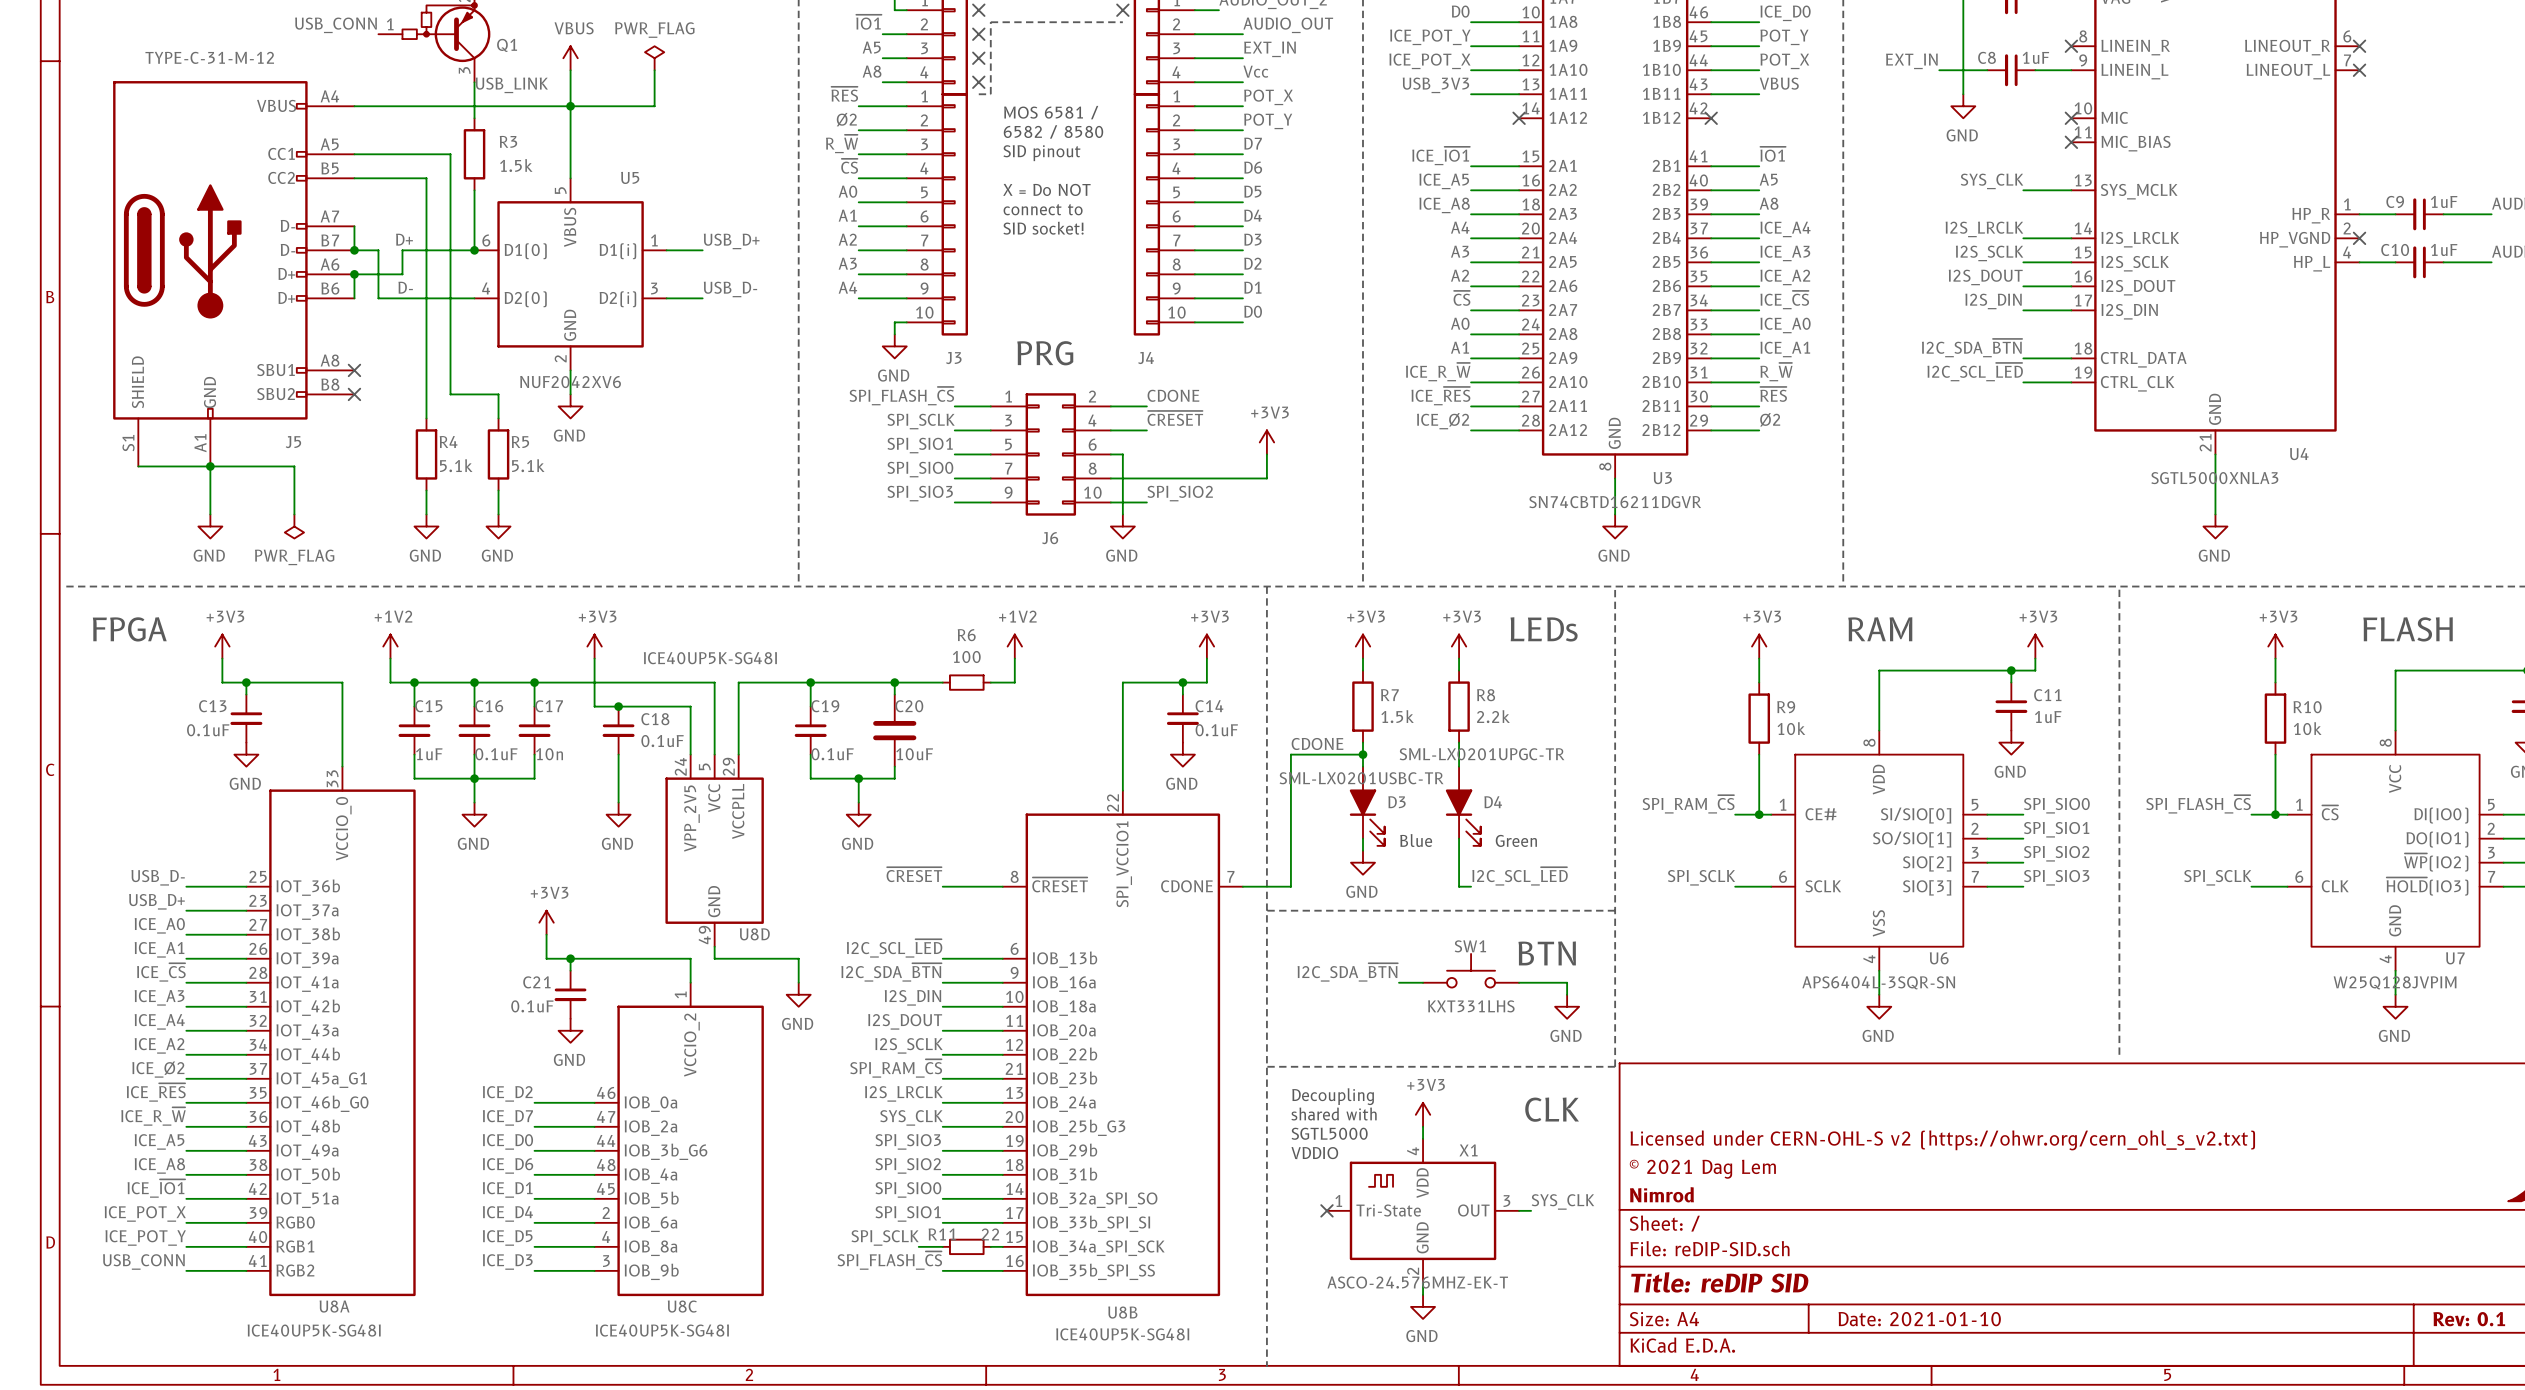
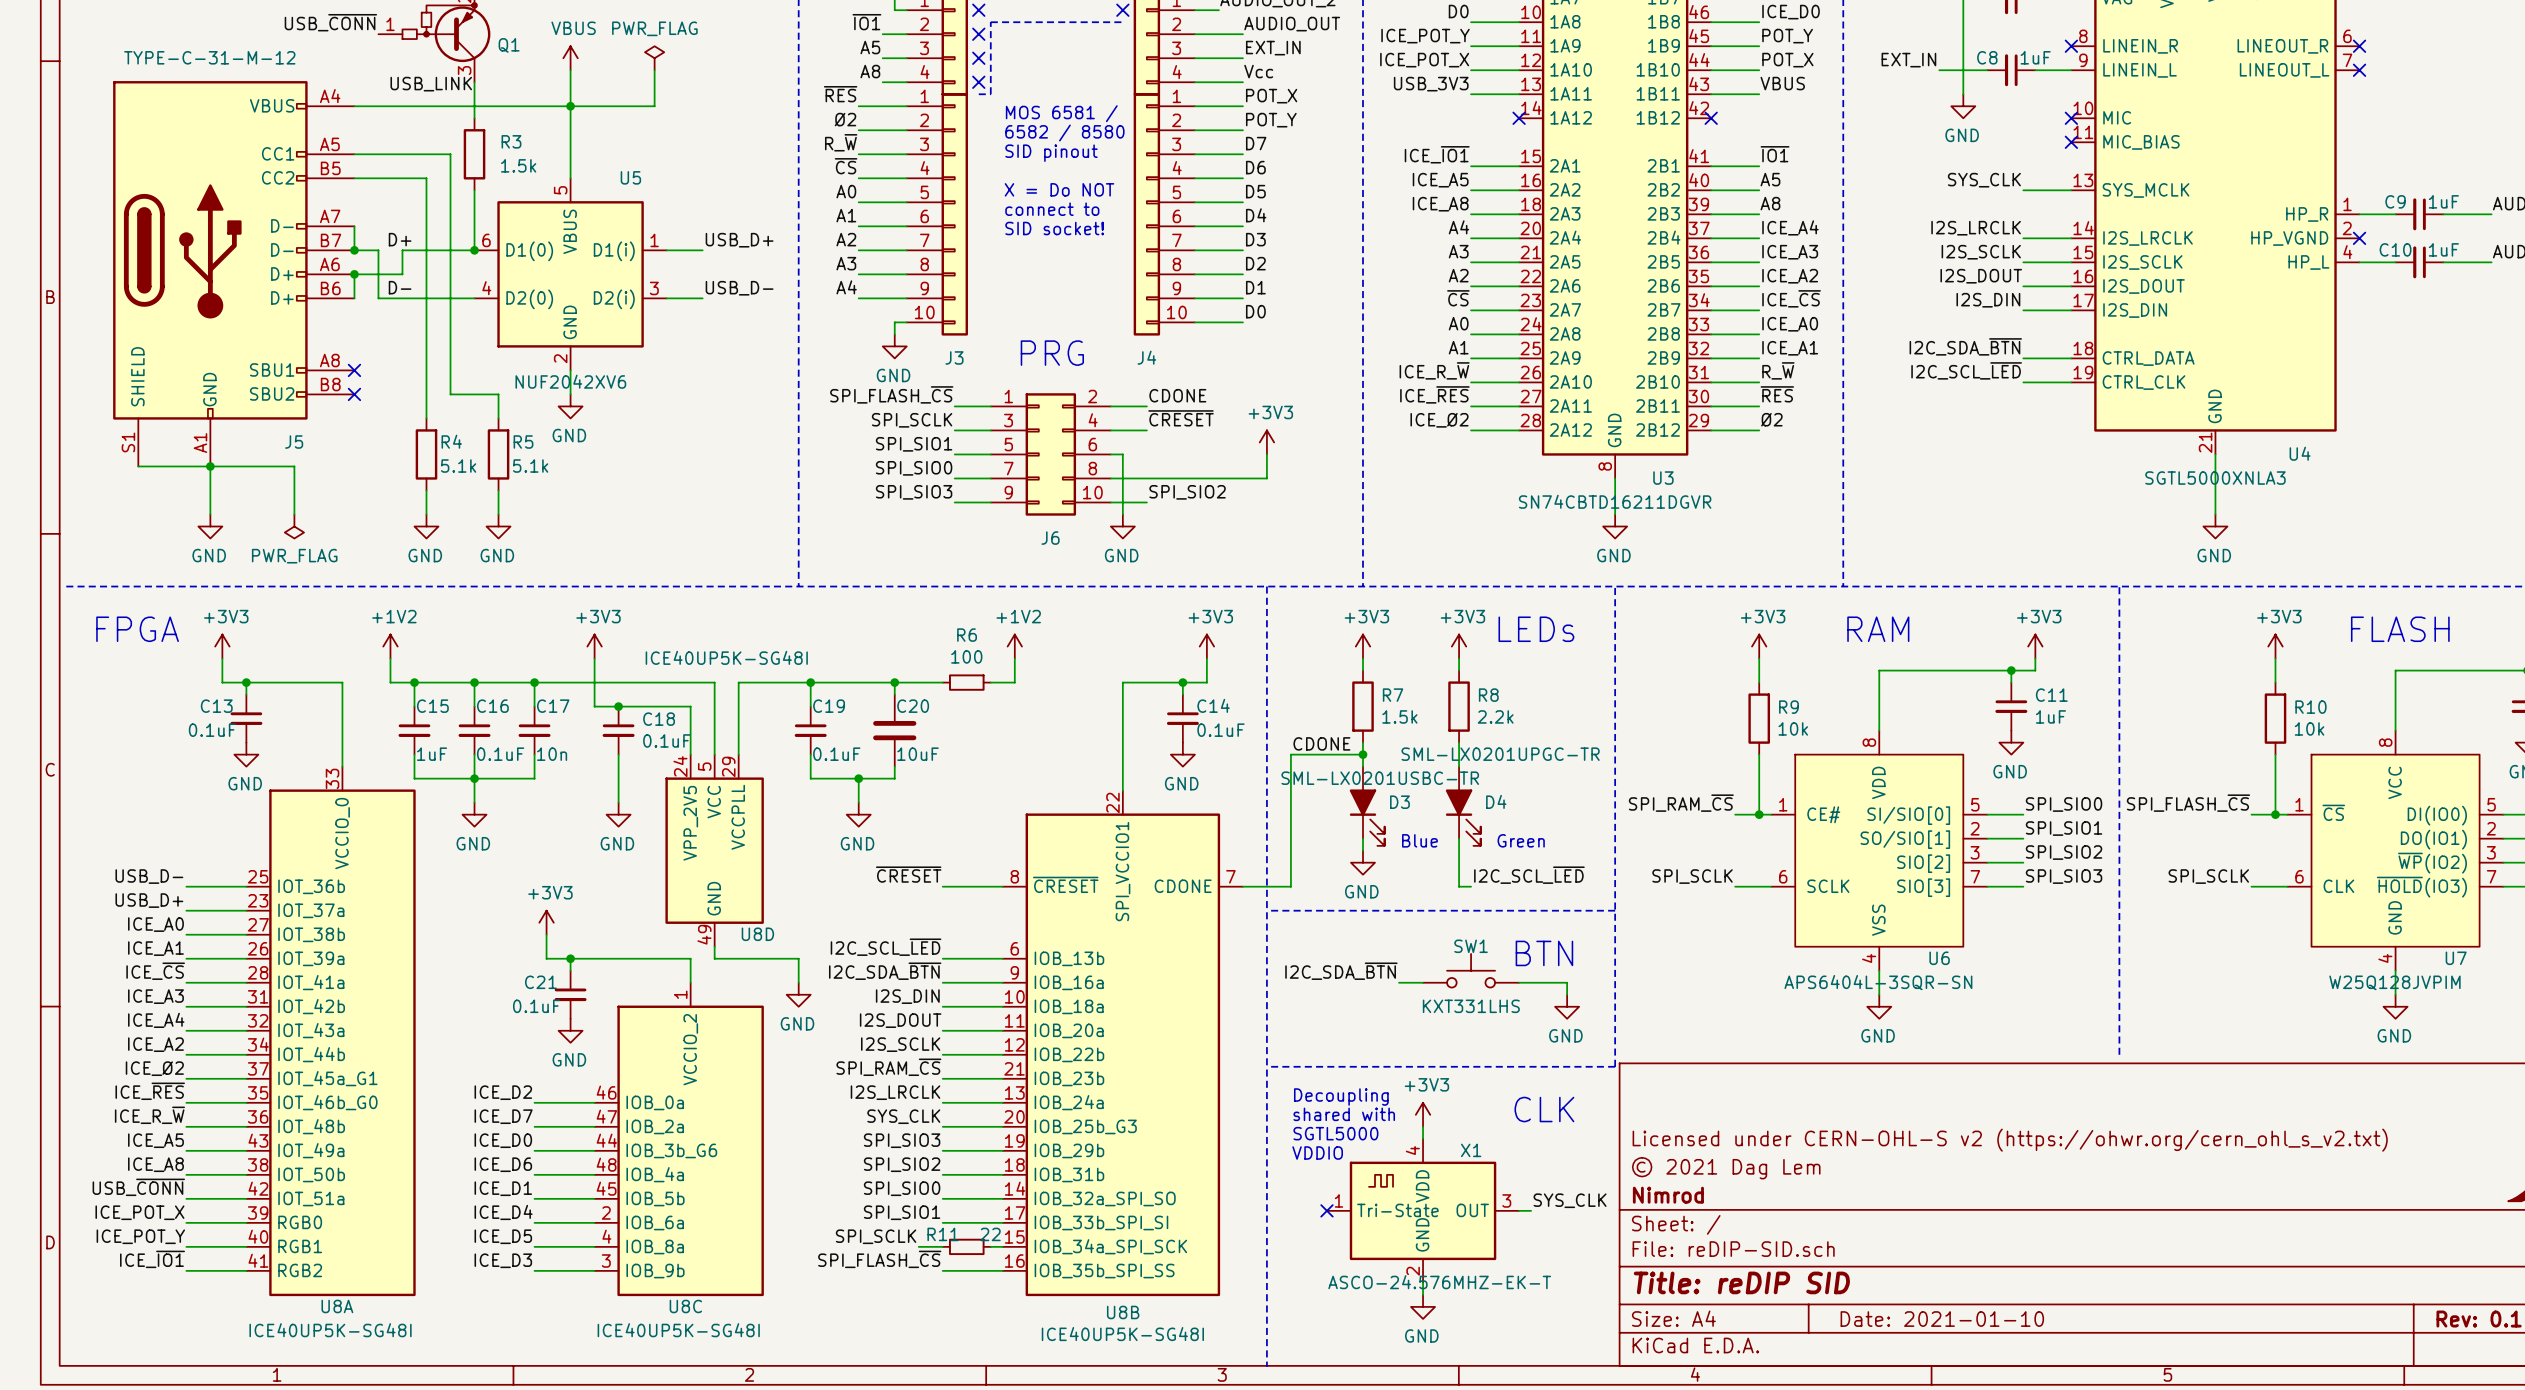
label: USB_CONN (335, 25) -> USB_~{CONN} (330, 22)
label position: USB_LINK (511, 85) -> USB_LINK (431, 84)
label: ICE_~{IO1} (156, 1188) -> USB_~{CONN} (138, 1187)
label: USB_CONN (143, 1261) -> ICE_~{IO1} (152, 1259)

